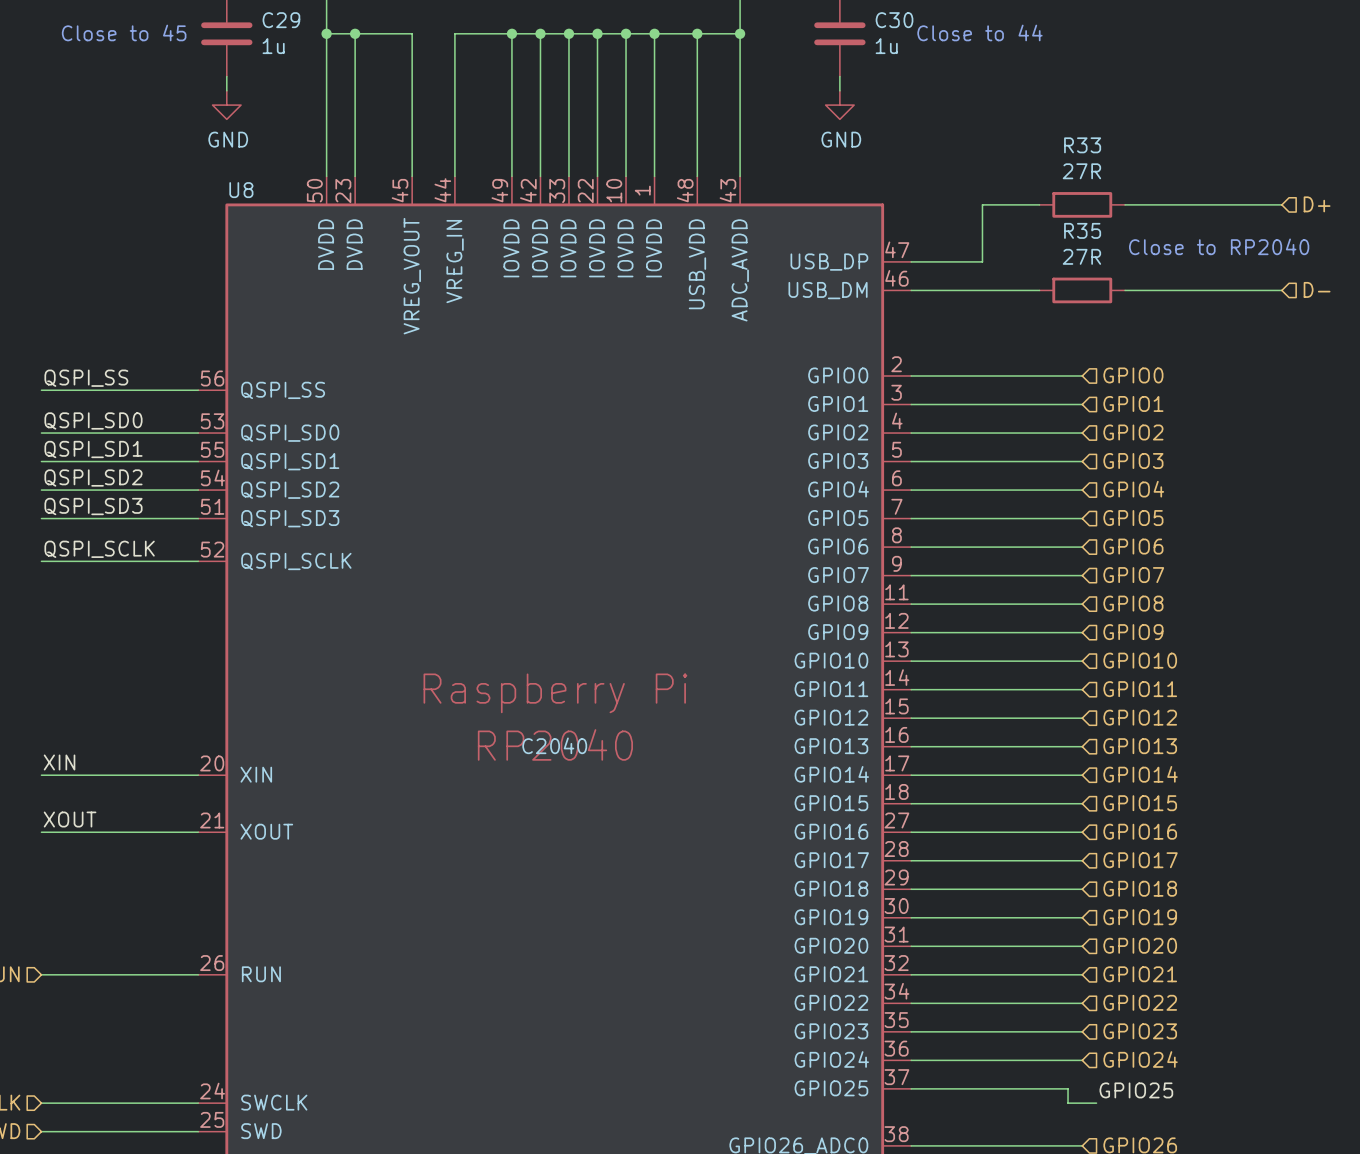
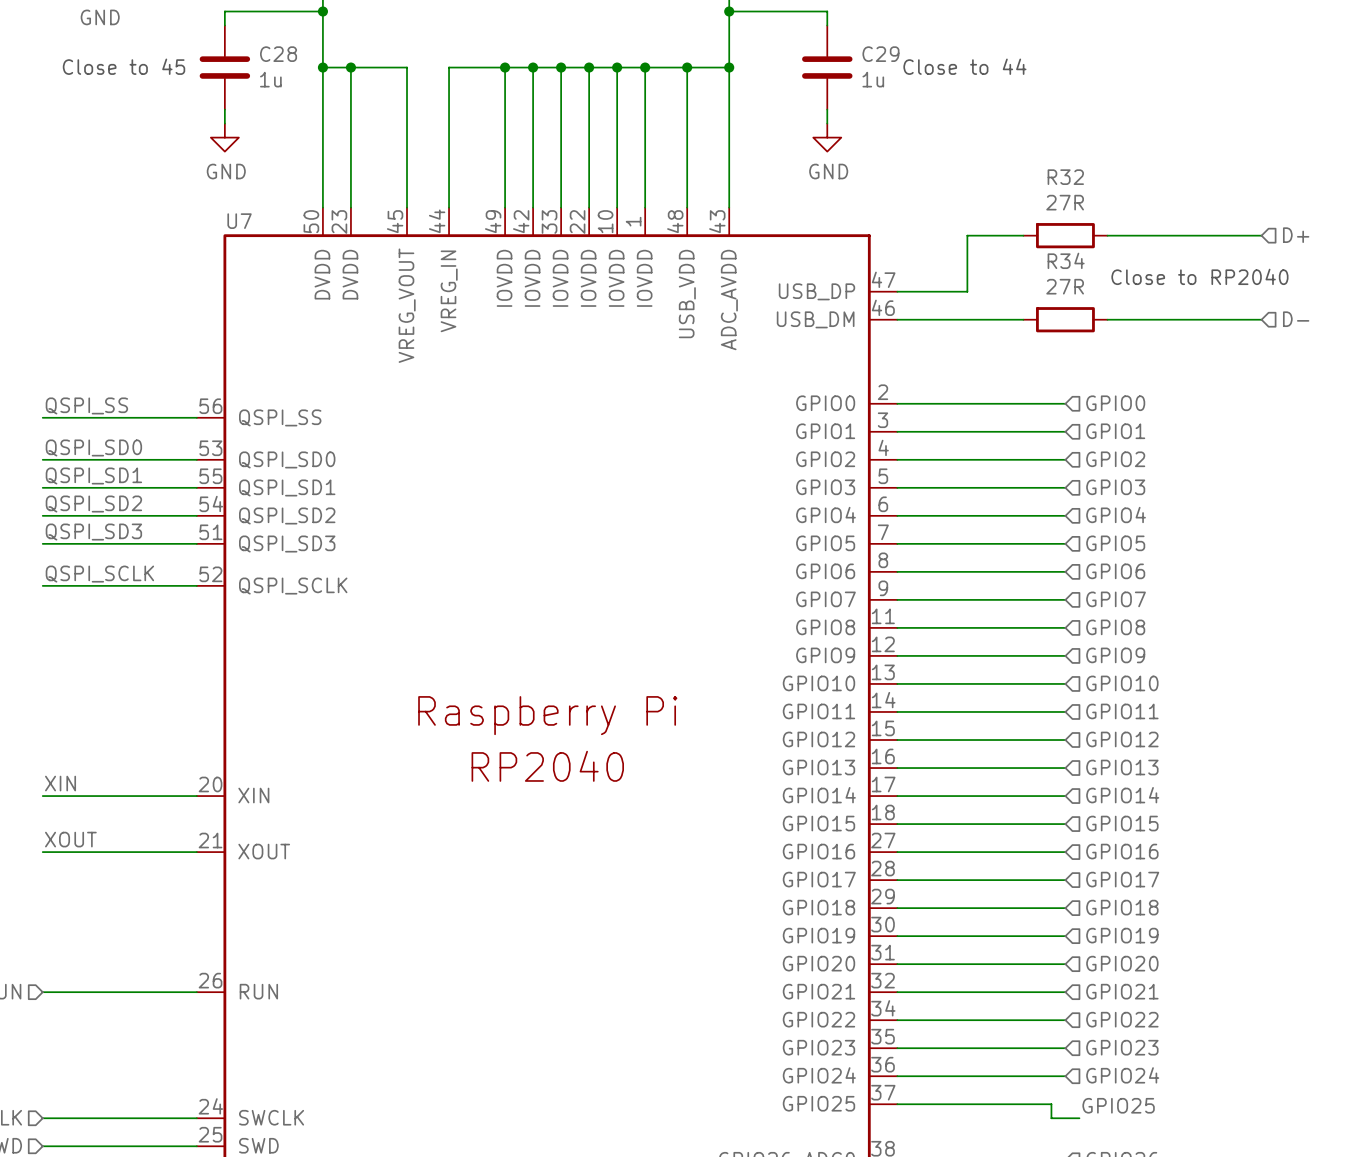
C29 name: C29 (281, 20) -> C28 (278, 54)
C30 name: C30 (894, 20) -> C29 (880, 54)
R33 name: R33 (1082, 145) -> R32 (1065, 177)
U8 name: U8 (241, 190) -> U7 (239, 221)
R35 name: R35 (1082, 230) -> R34 (1066, 260)
U8 text: C2040 (554, 745) -> none

